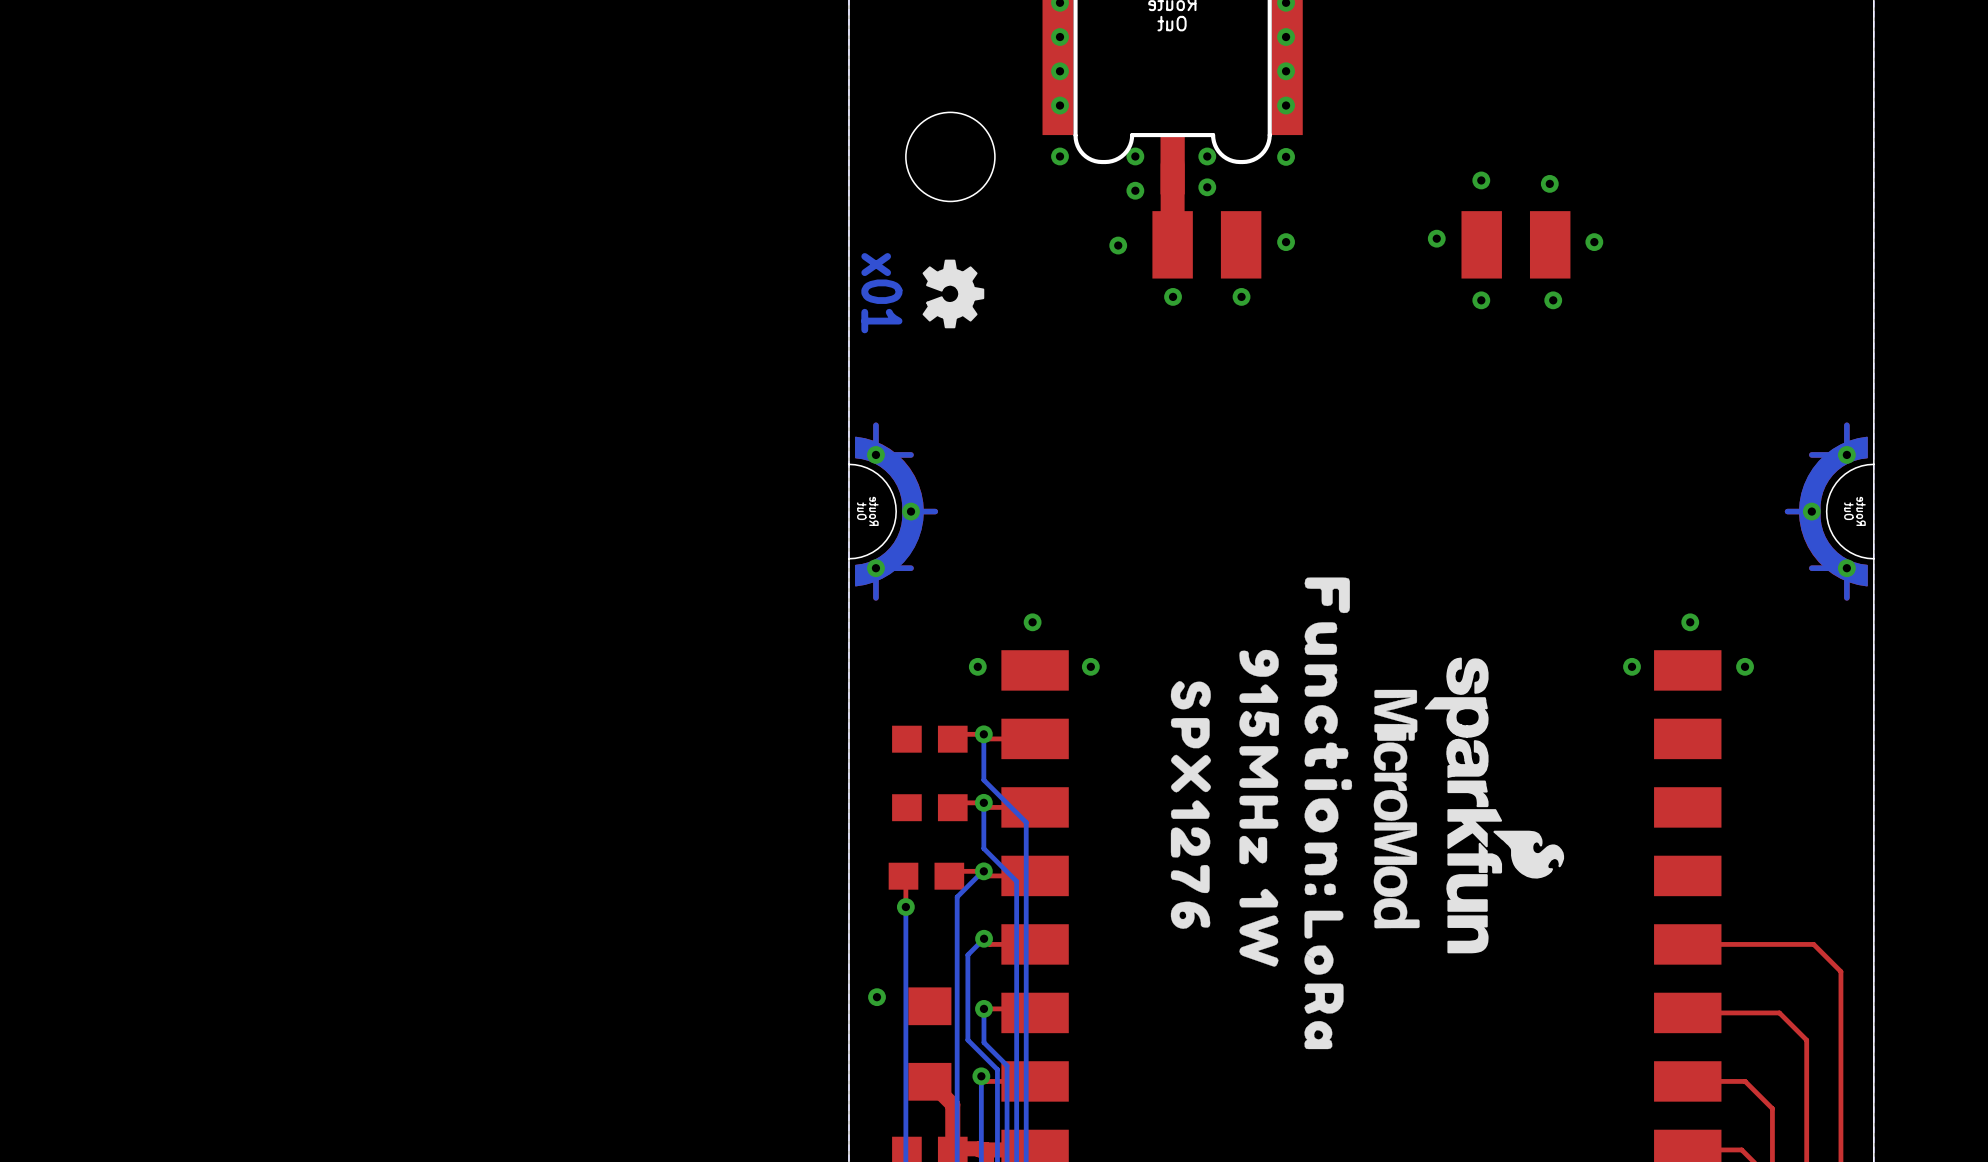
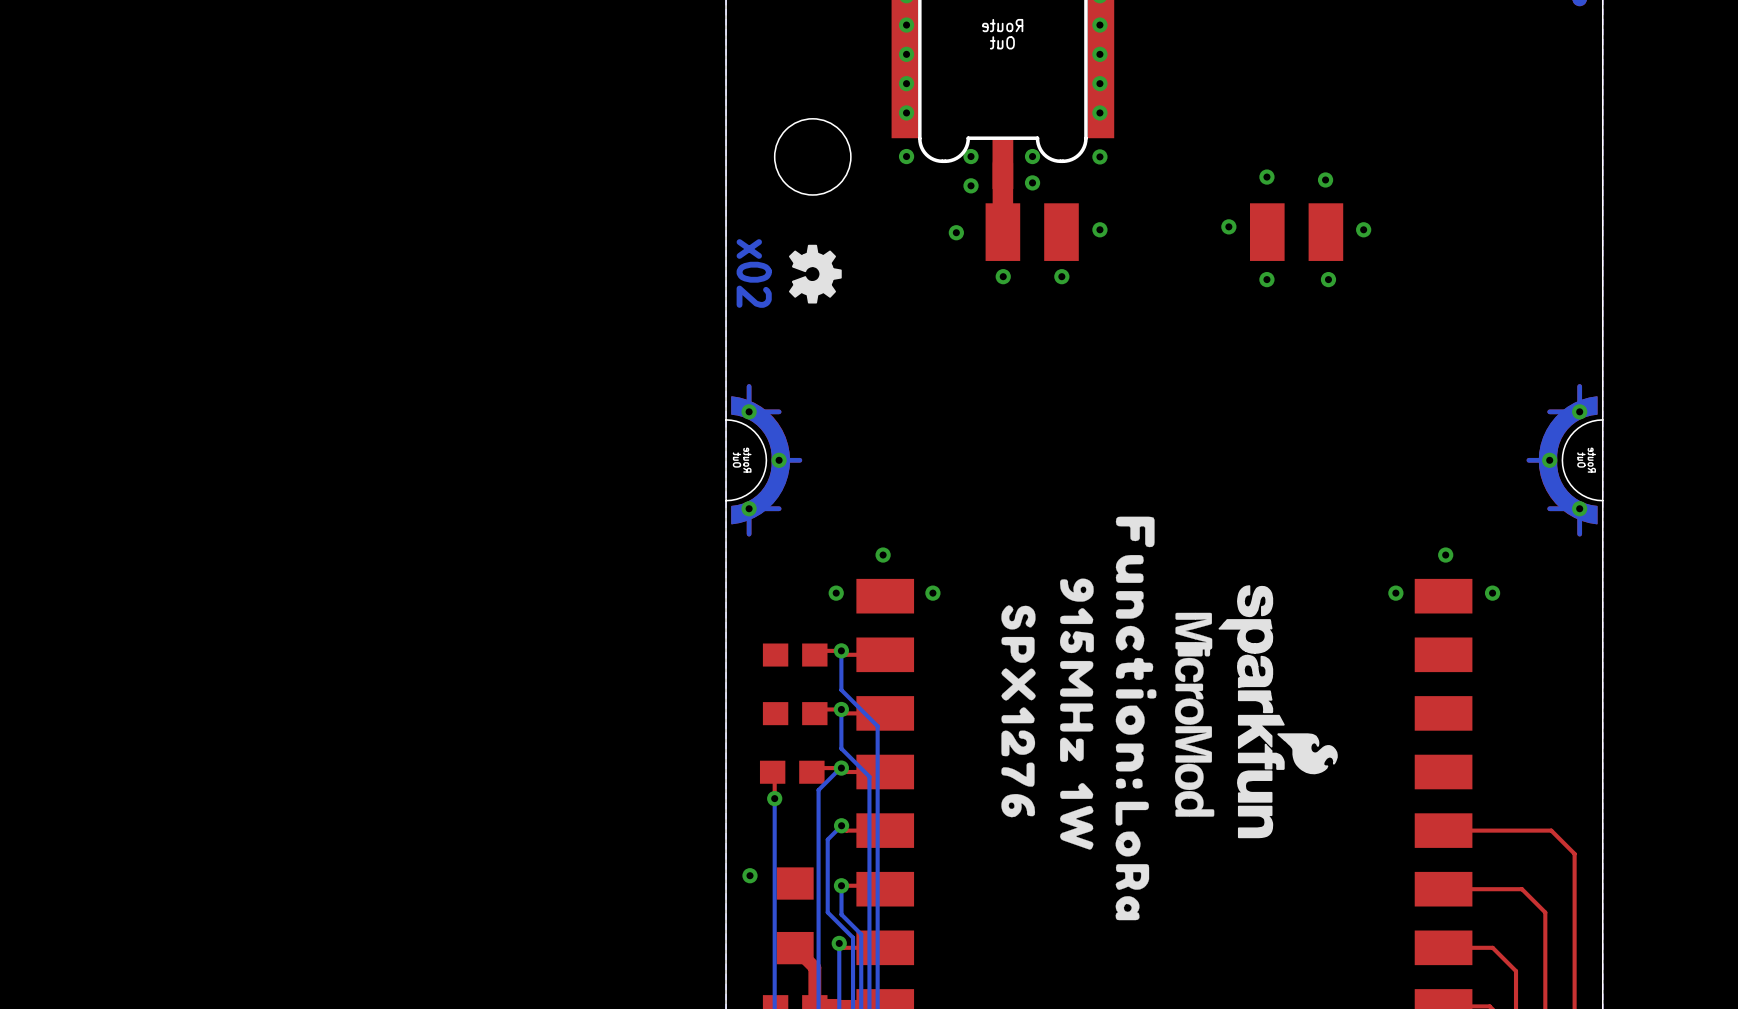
text: x01 (881, 293) -> x02 (754, 273)

